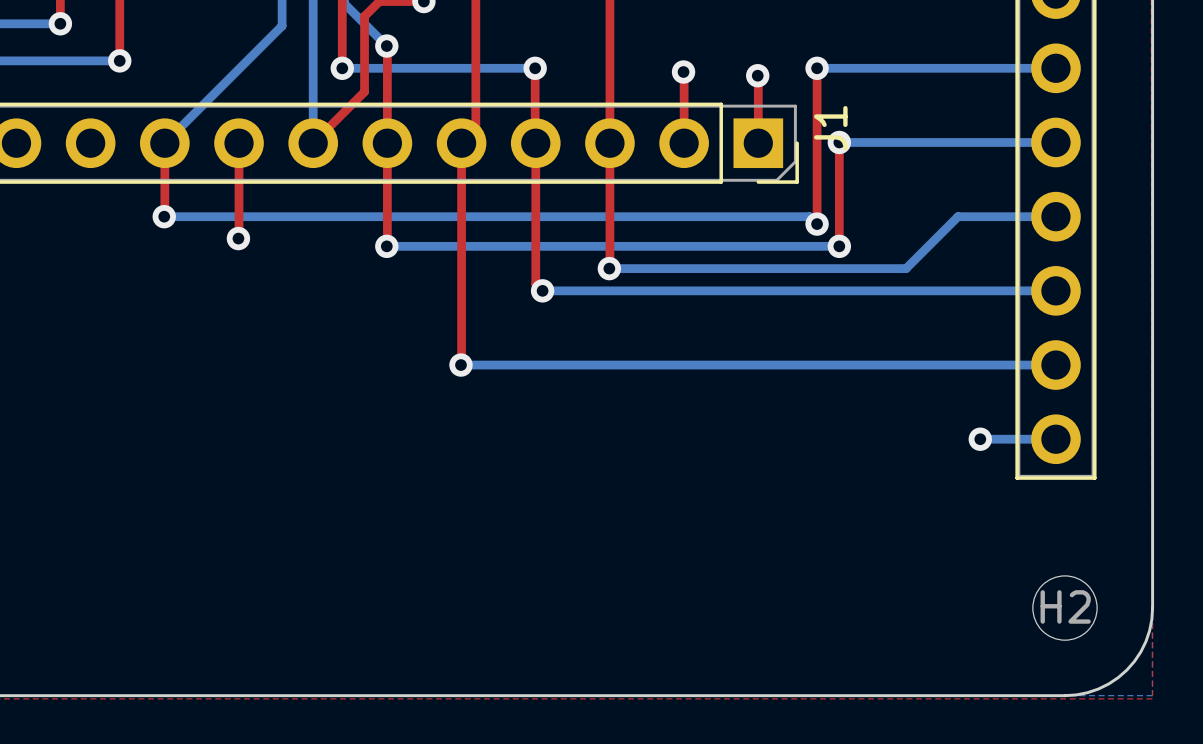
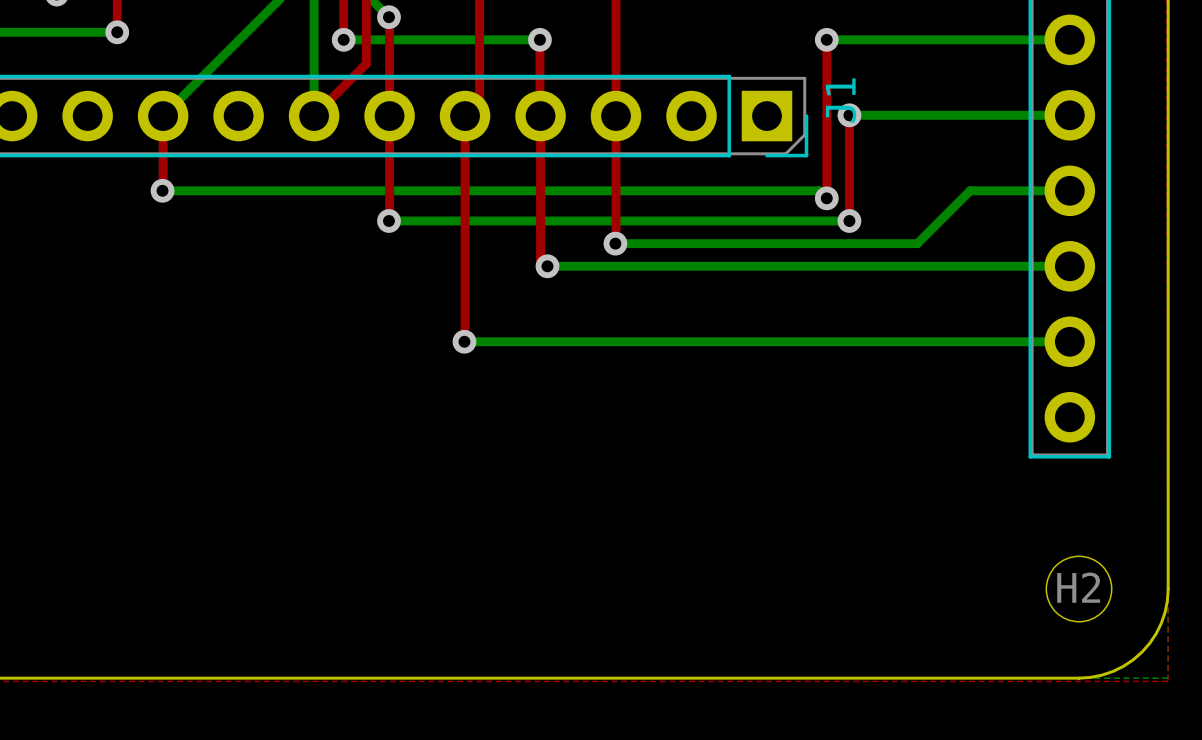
top track: (683, 72) (684, 143) -> none
via: (683, 72) -> none
top track: (757, 75) (758, 143) -> none
via: (757, 75) -> none
top track: (239, 143) (238, 238) -> none
via: (238, 238) -> none
bottom track: (980, 439) (1055, 439) -> none
via: (980, 439) -> none

